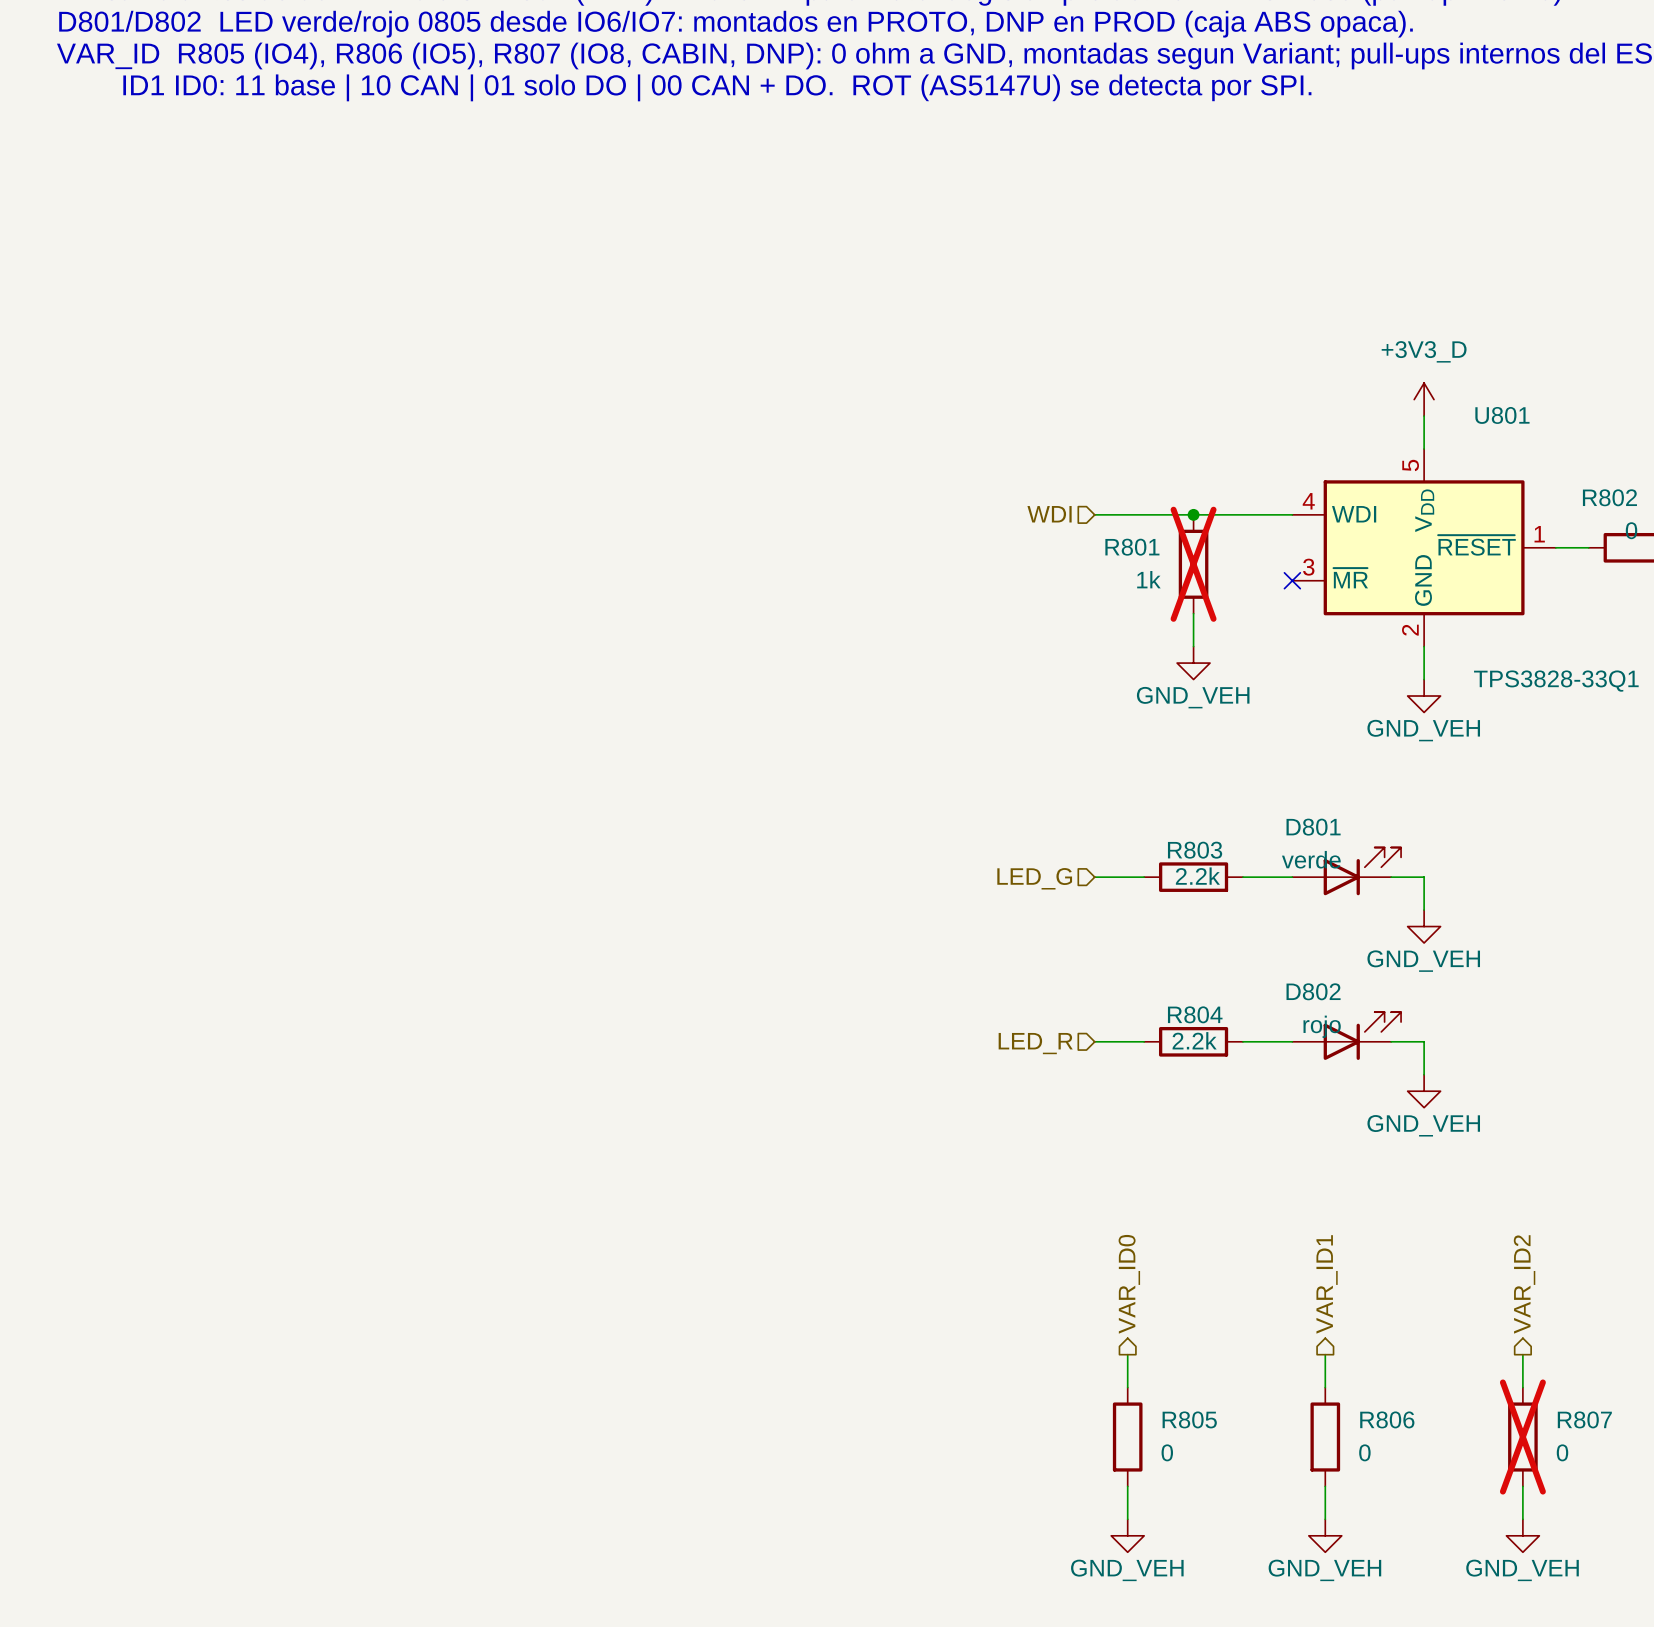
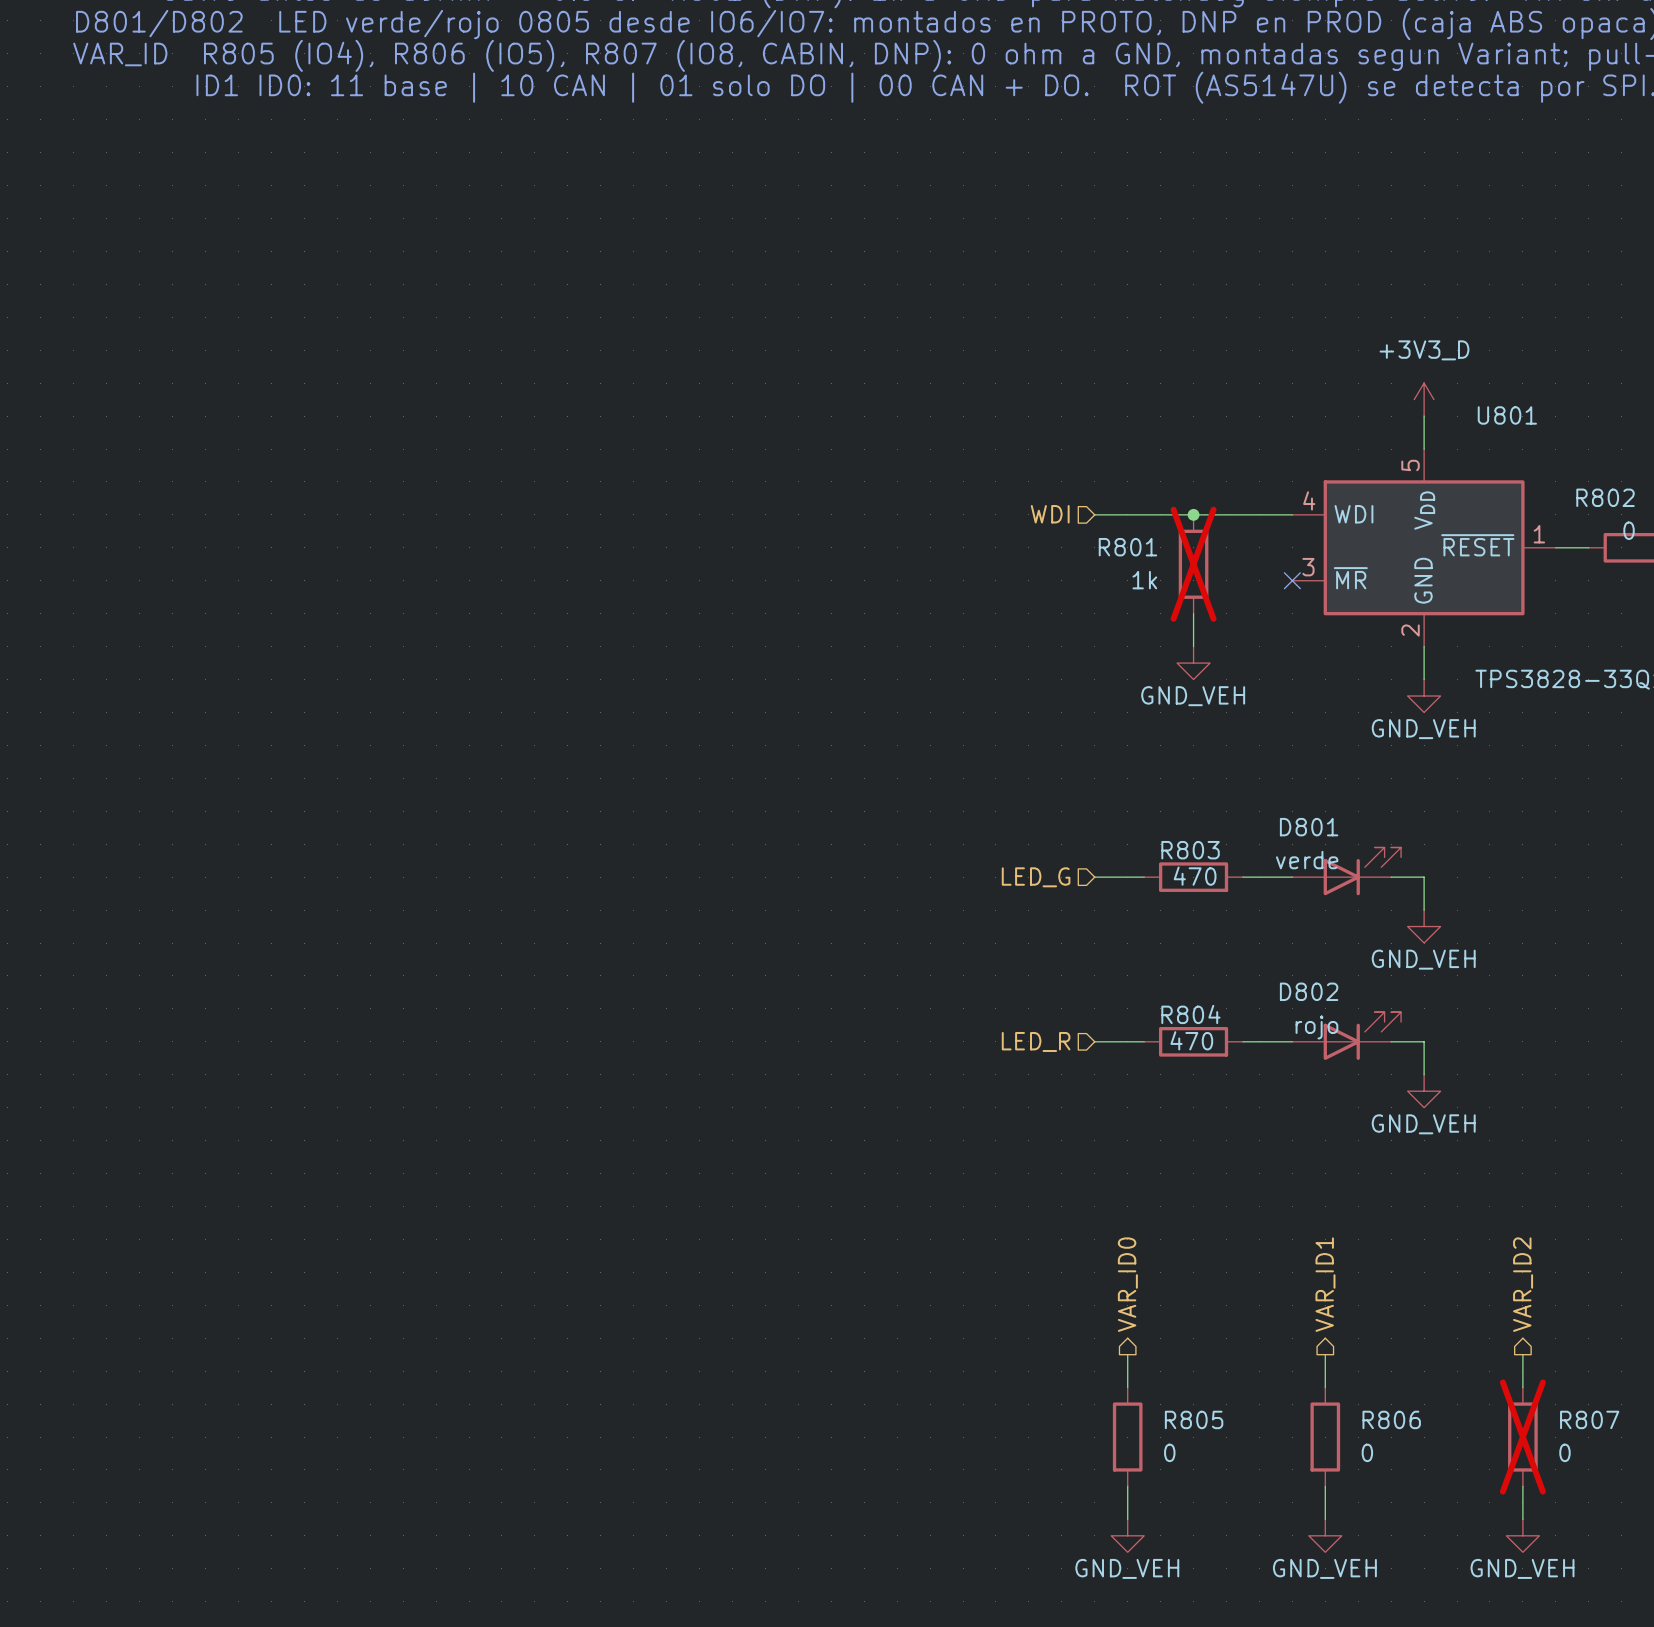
R803 value: 2.2k (1197, 876) -> 470 (1195, 876)
R804 value: 2.2k (1194, 1040) -> 470 (1191, 1040)

